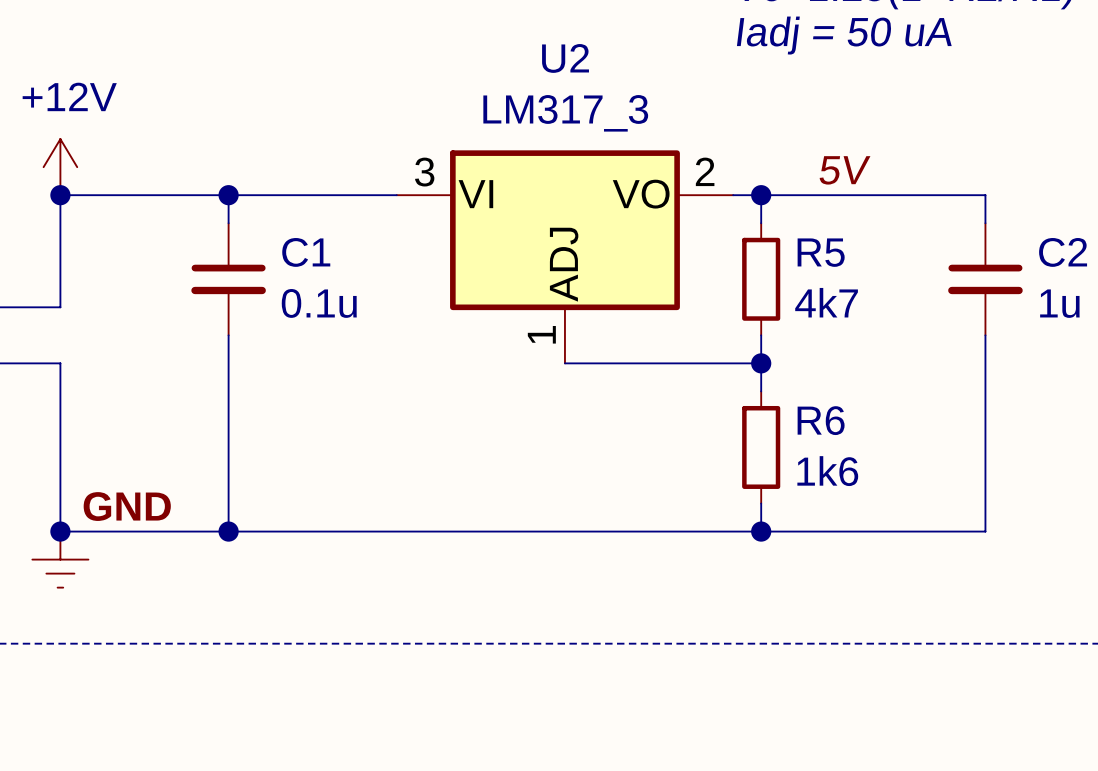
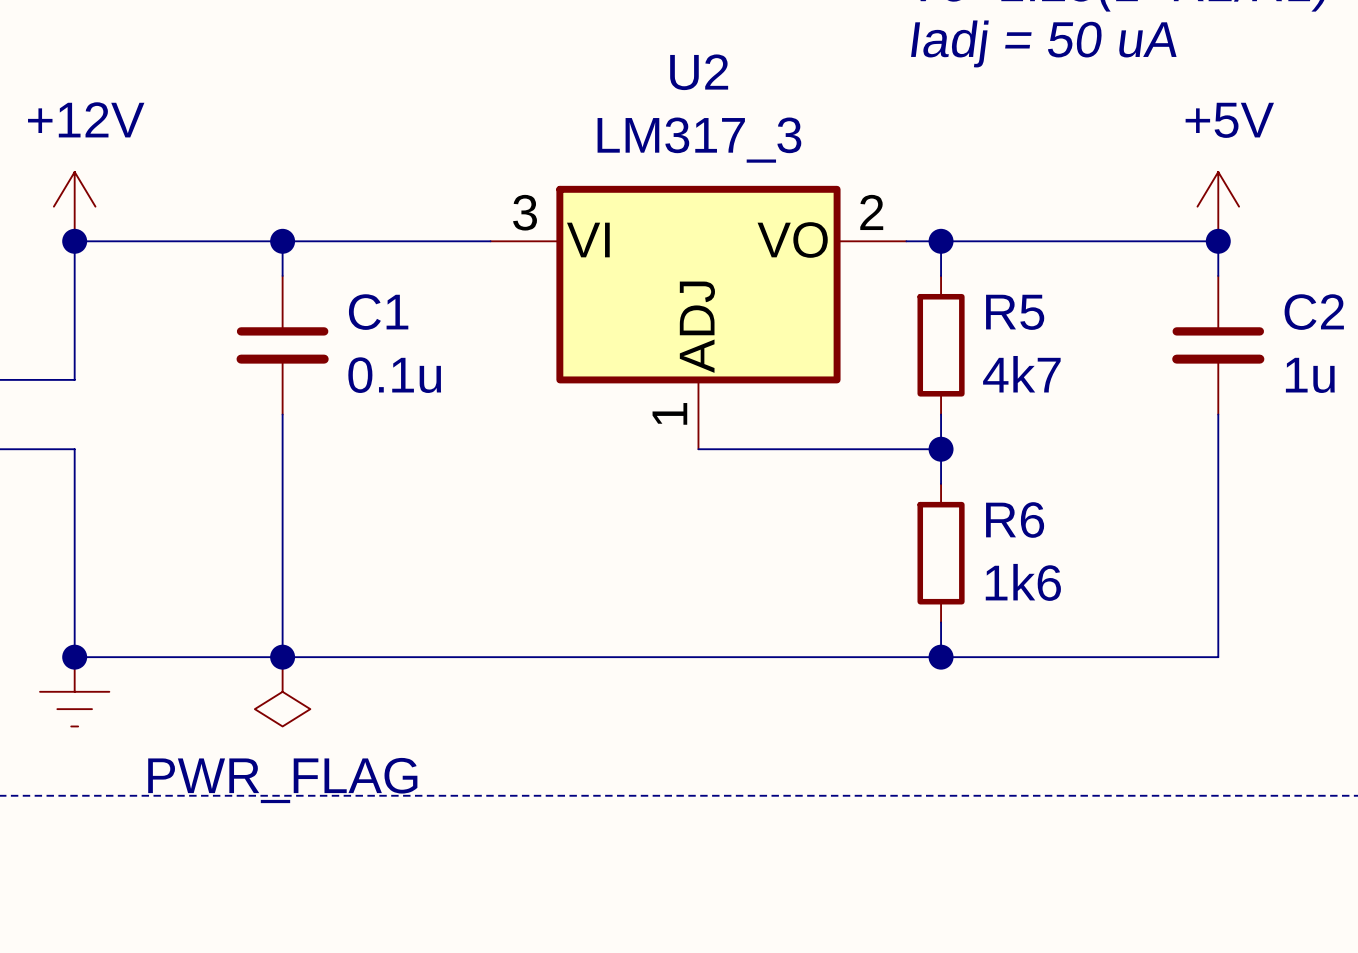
power symbol: none -> +5V (1218, 206)
label: 5V (845, 170) -> none
junction: none -> (1218, 241)
label: GND (127, 506) -> none
power symbol: none -> PWR_FLAG (282, 691)

